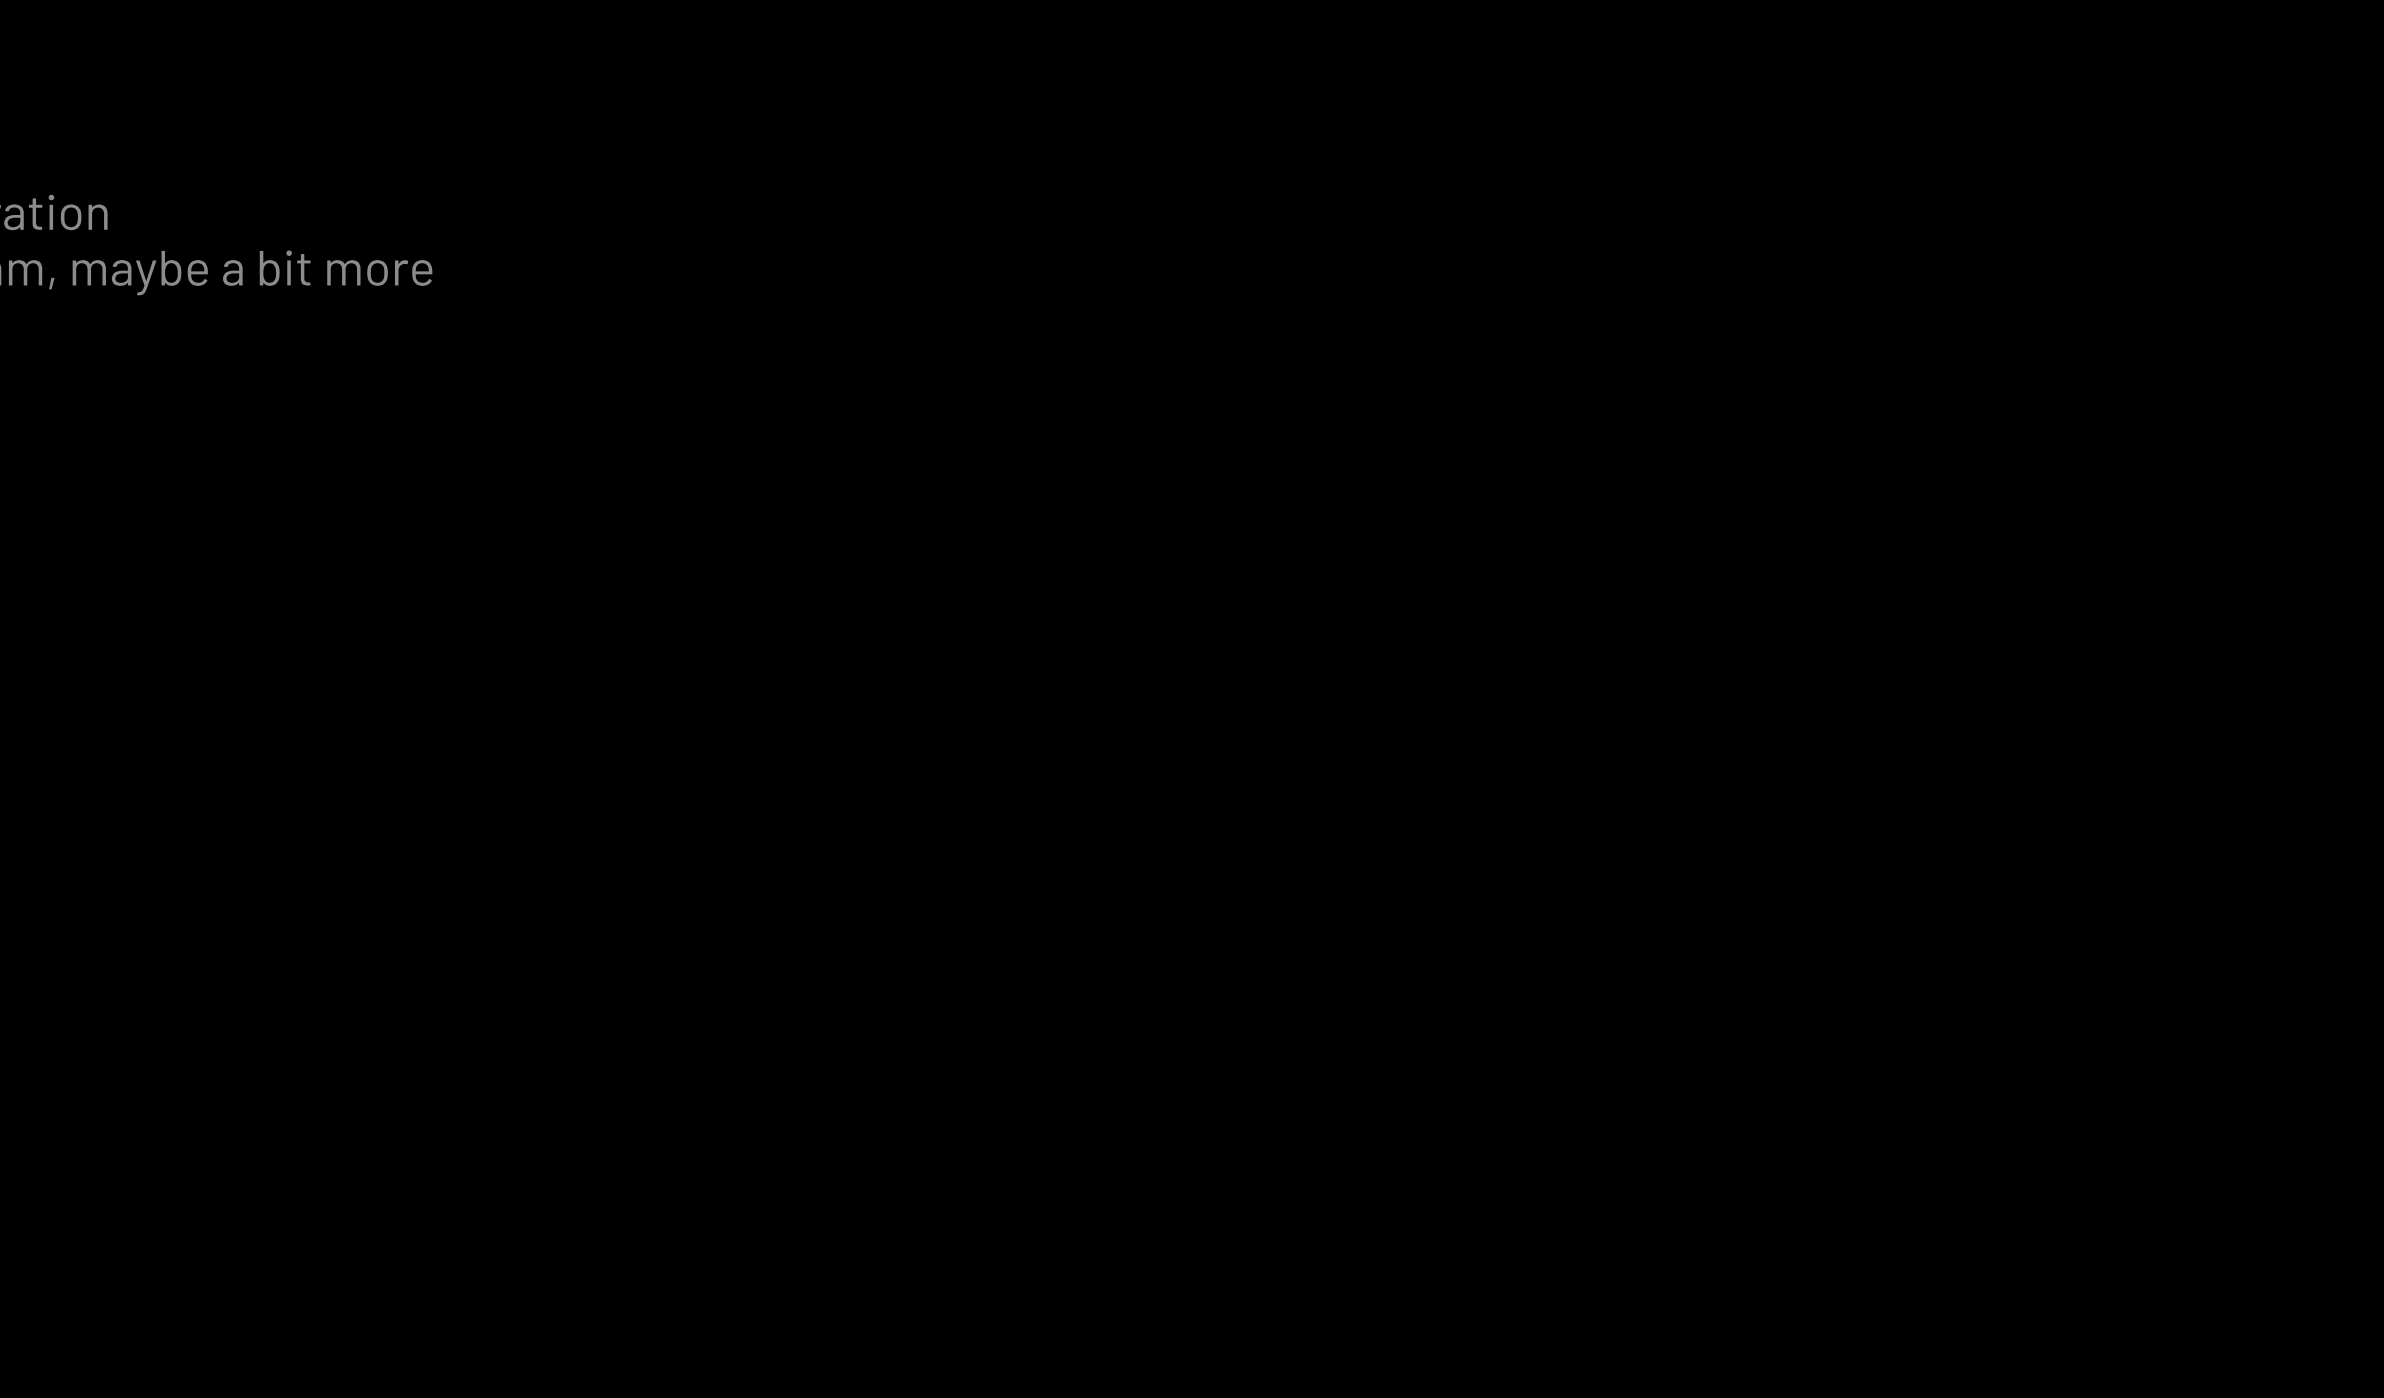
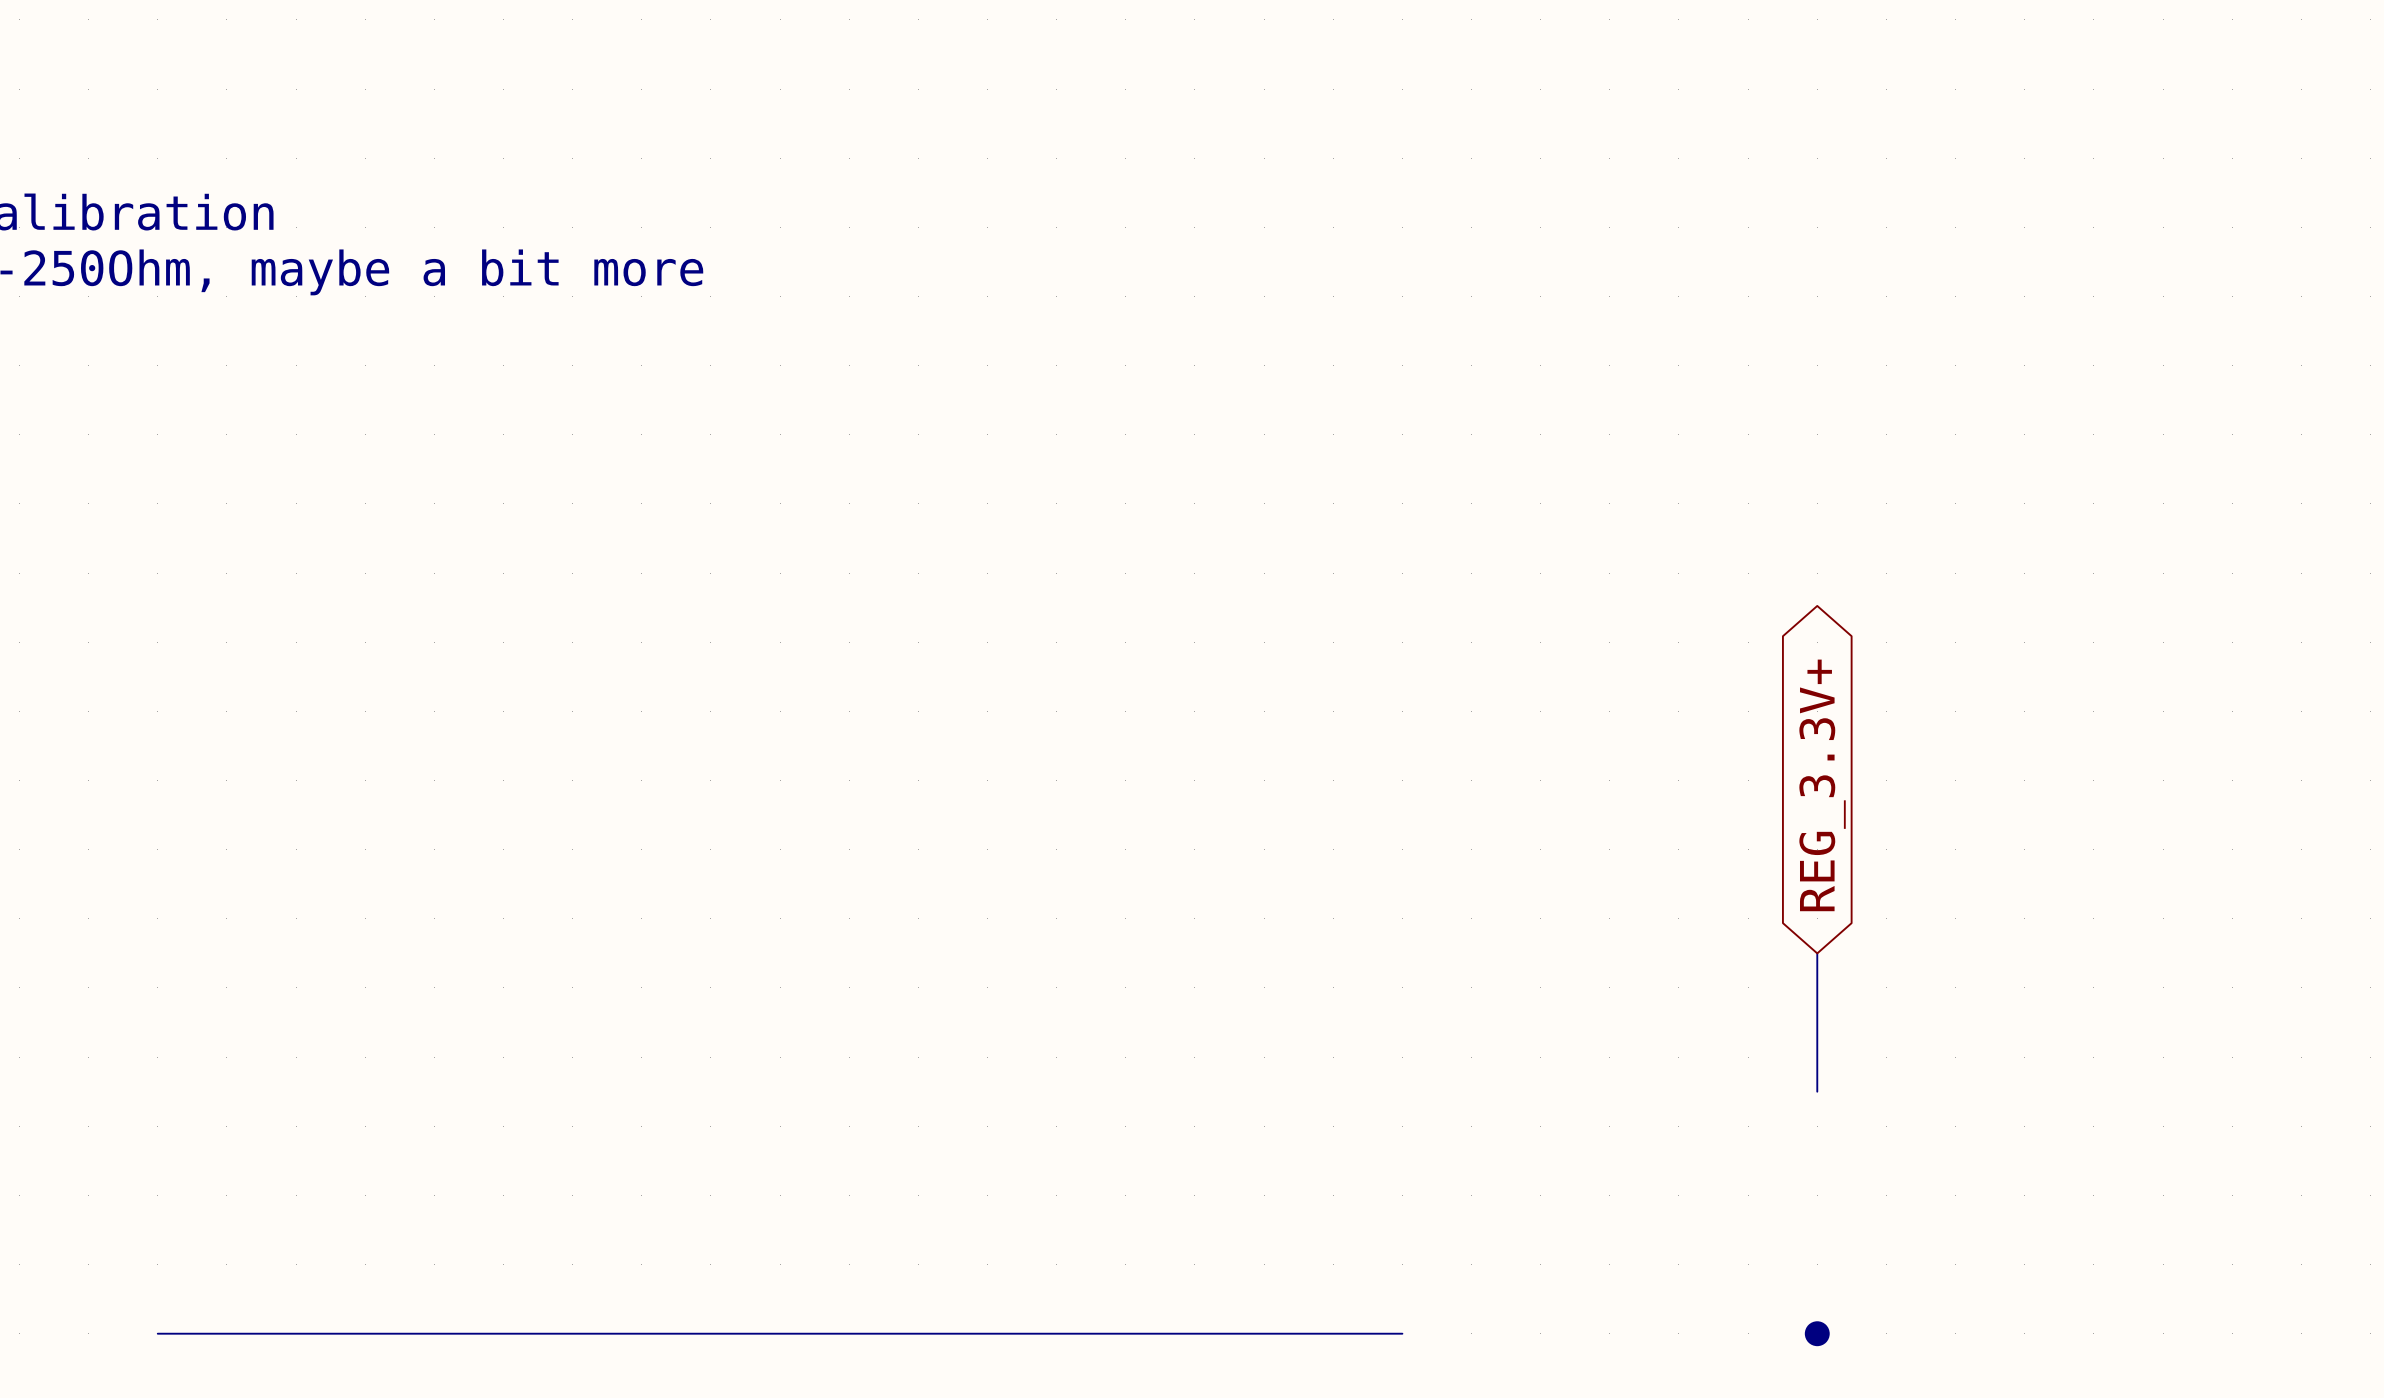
global label: none -> REG_3.3V+ (1822, 785)
wire: none -> (1817, 953) (1817, 1091)
wire: none -> (157, 1333) (1402, 1333)
junction: none -> (1817, 1333)

